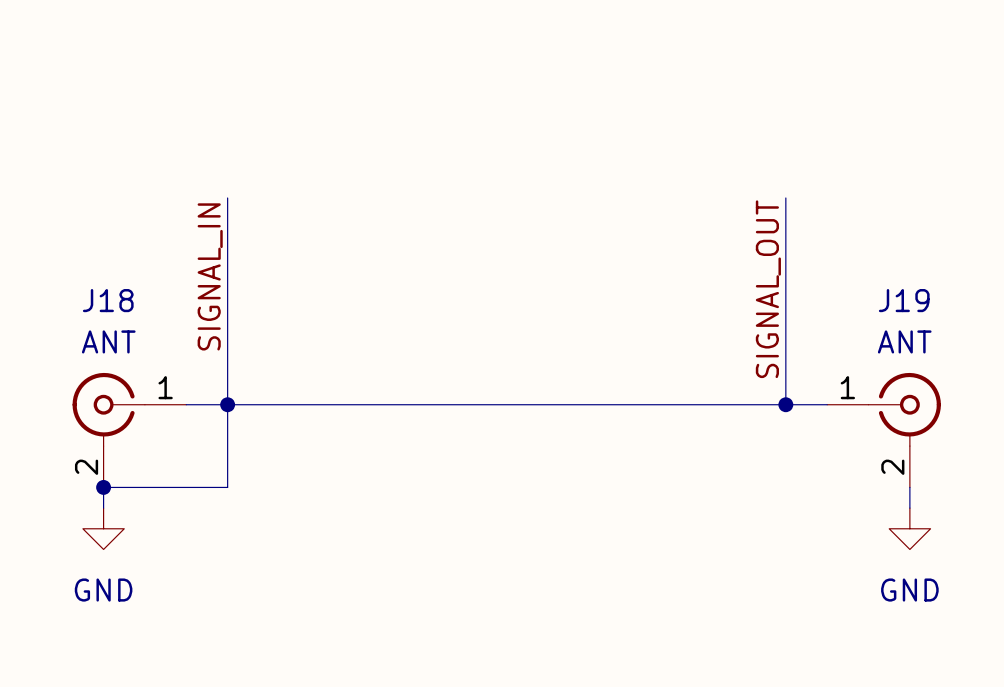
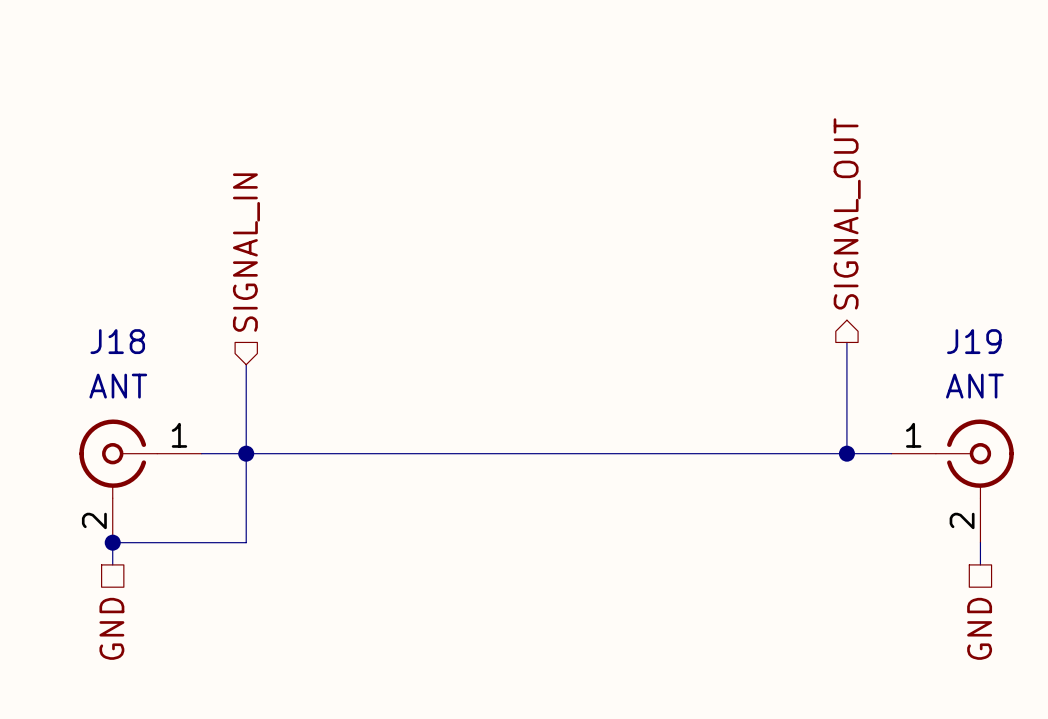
hierarchical label: none -> SIGNAL_OUT (847, 213)
wire: (227, 197) (227, 322) -> none
wire: (785, 197) (785, 301) -> none
hierarchical label: none -> SIGNAL_IN (246, 252)
label: SIGNAL_IN (210, 276) -> none
label: SIGNAL_OUT (768, 289) -> none
power symbol: GND (103, 528) -> none
power symbol: GND (909, 528) -> none
hierarchical label: none -> GND (111, 628)
hierarchical label: none -> GND (979, 628)

